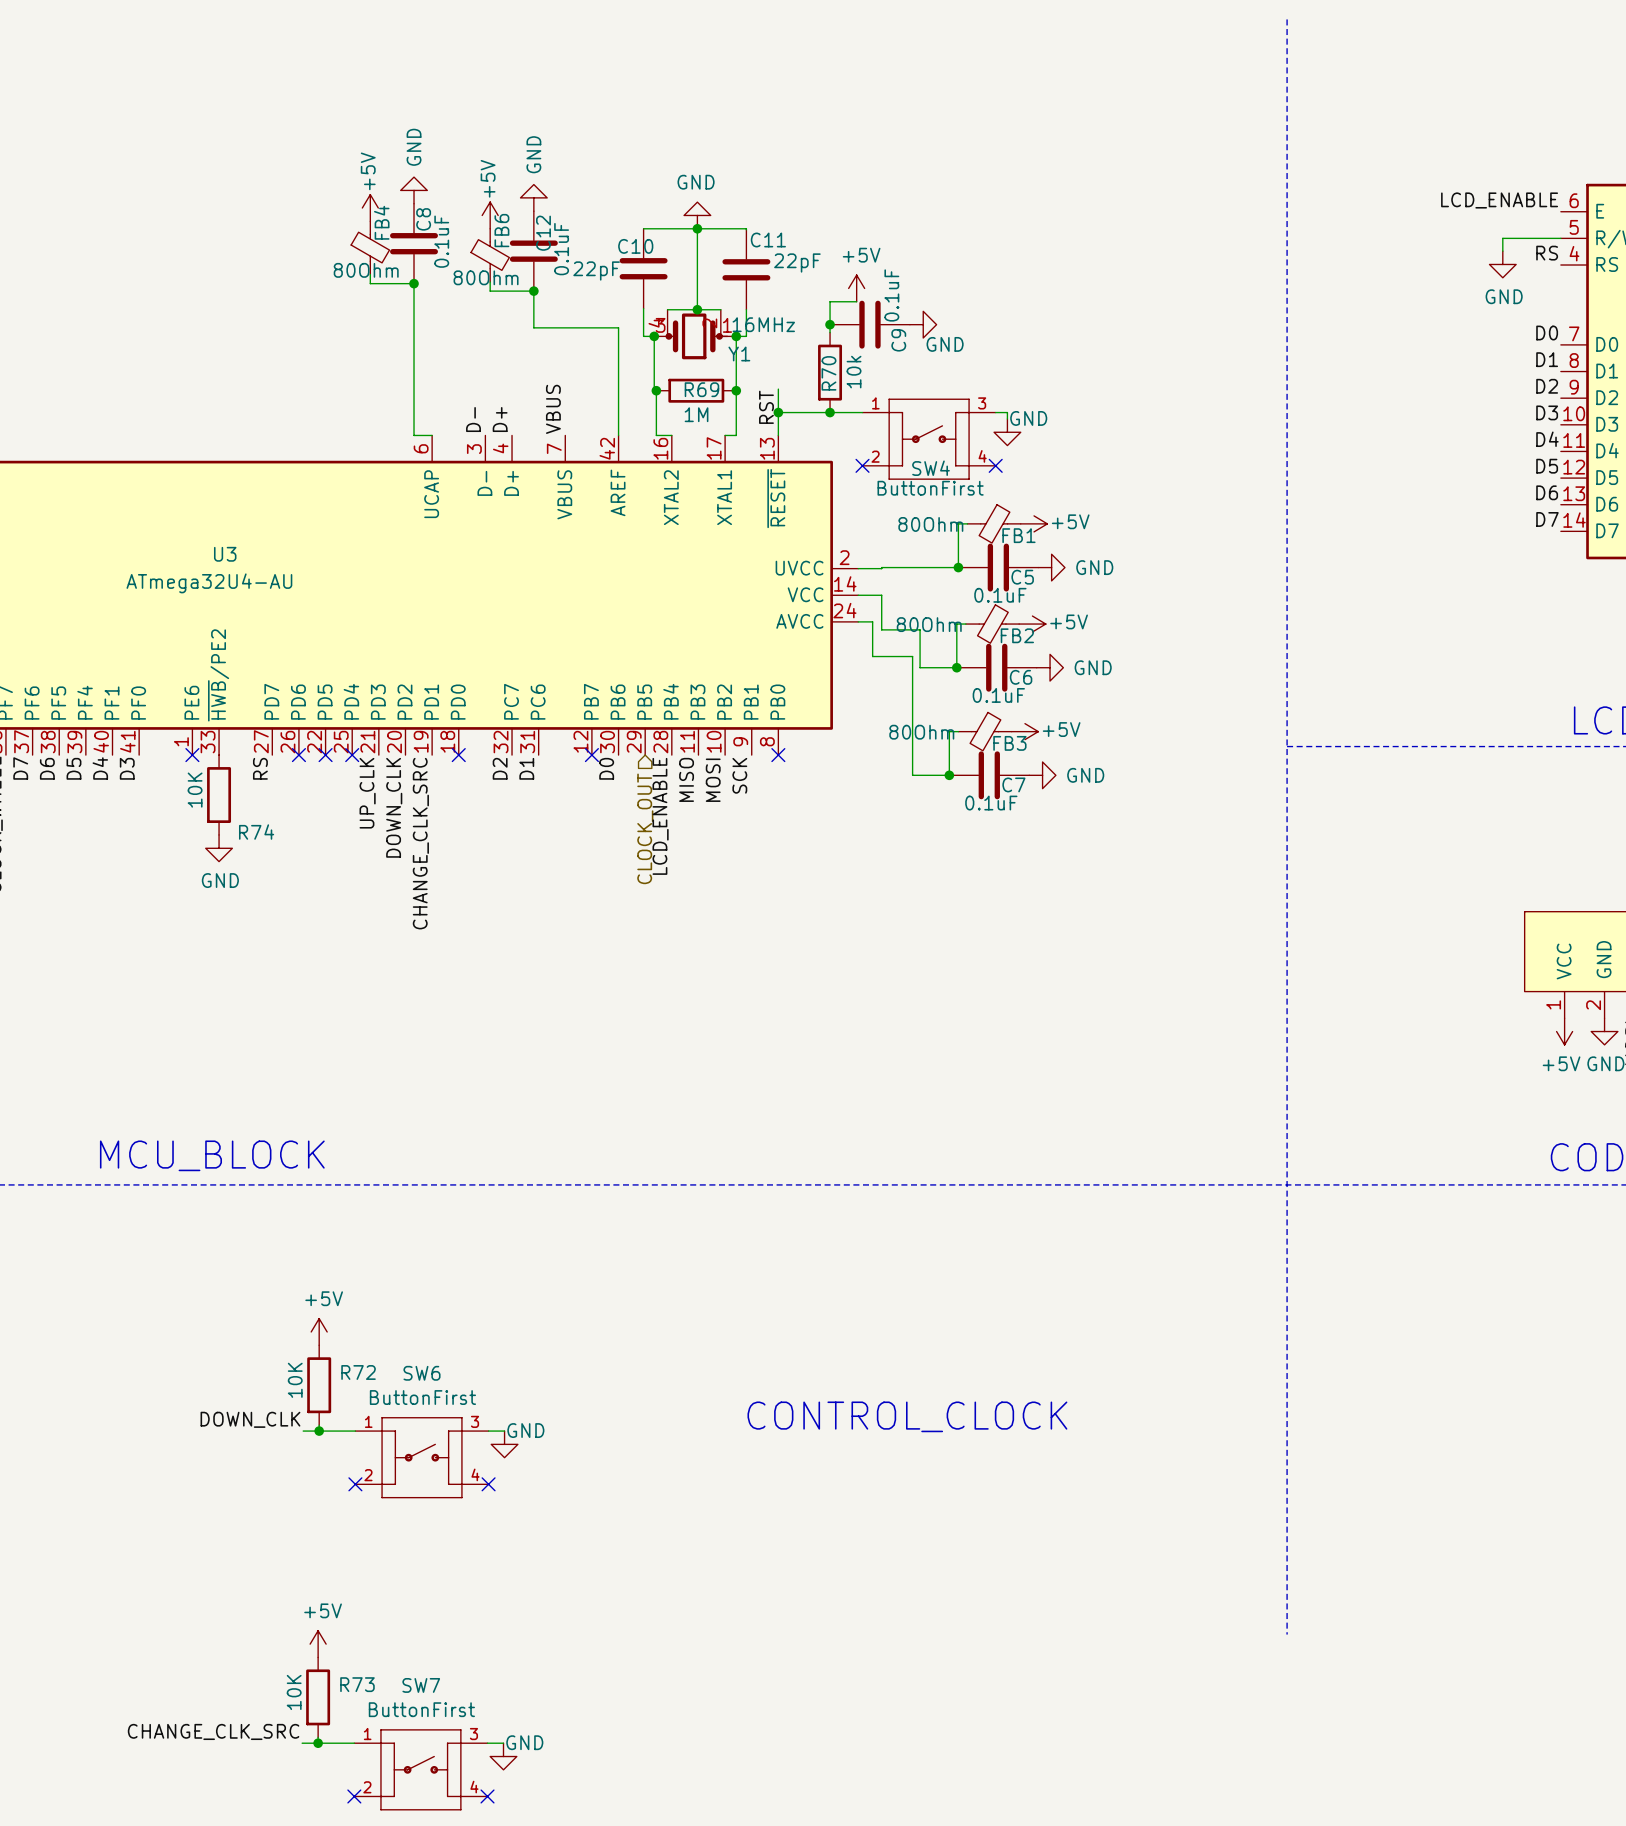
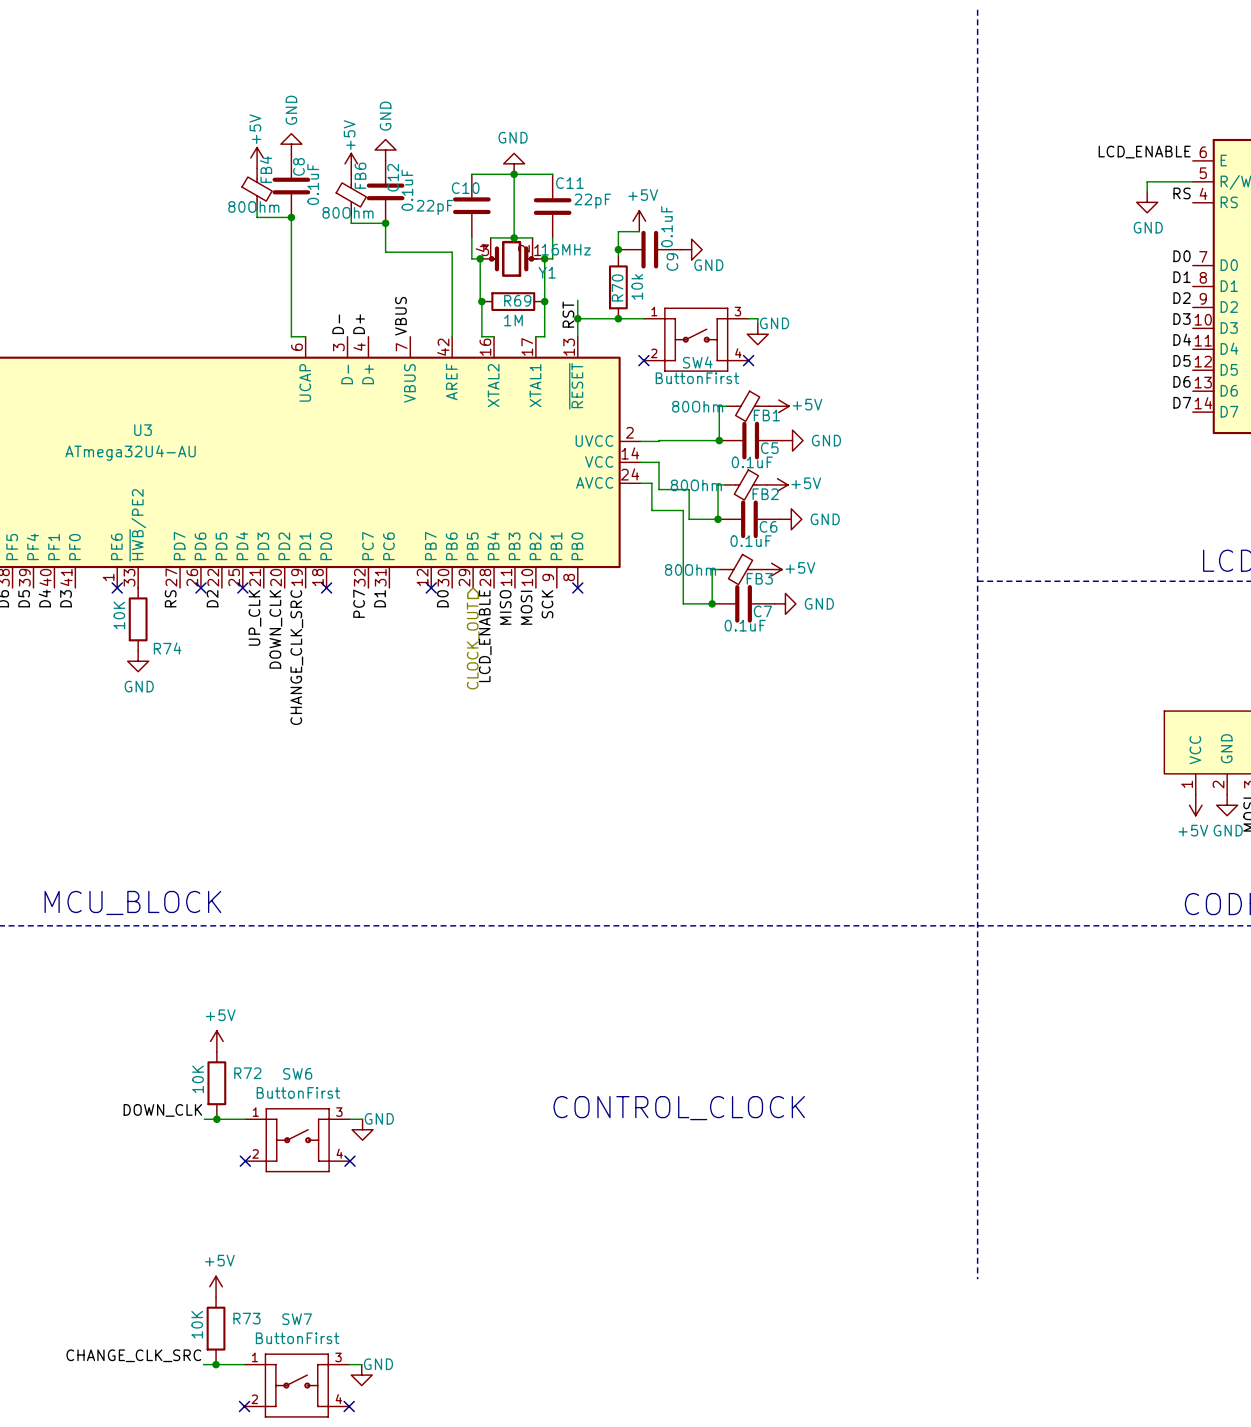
no-connect mark: (325, 755) -> none
label: none -> D2 (212, 598)
label: D2 (500, 768) -> PC7 (359, 603)

